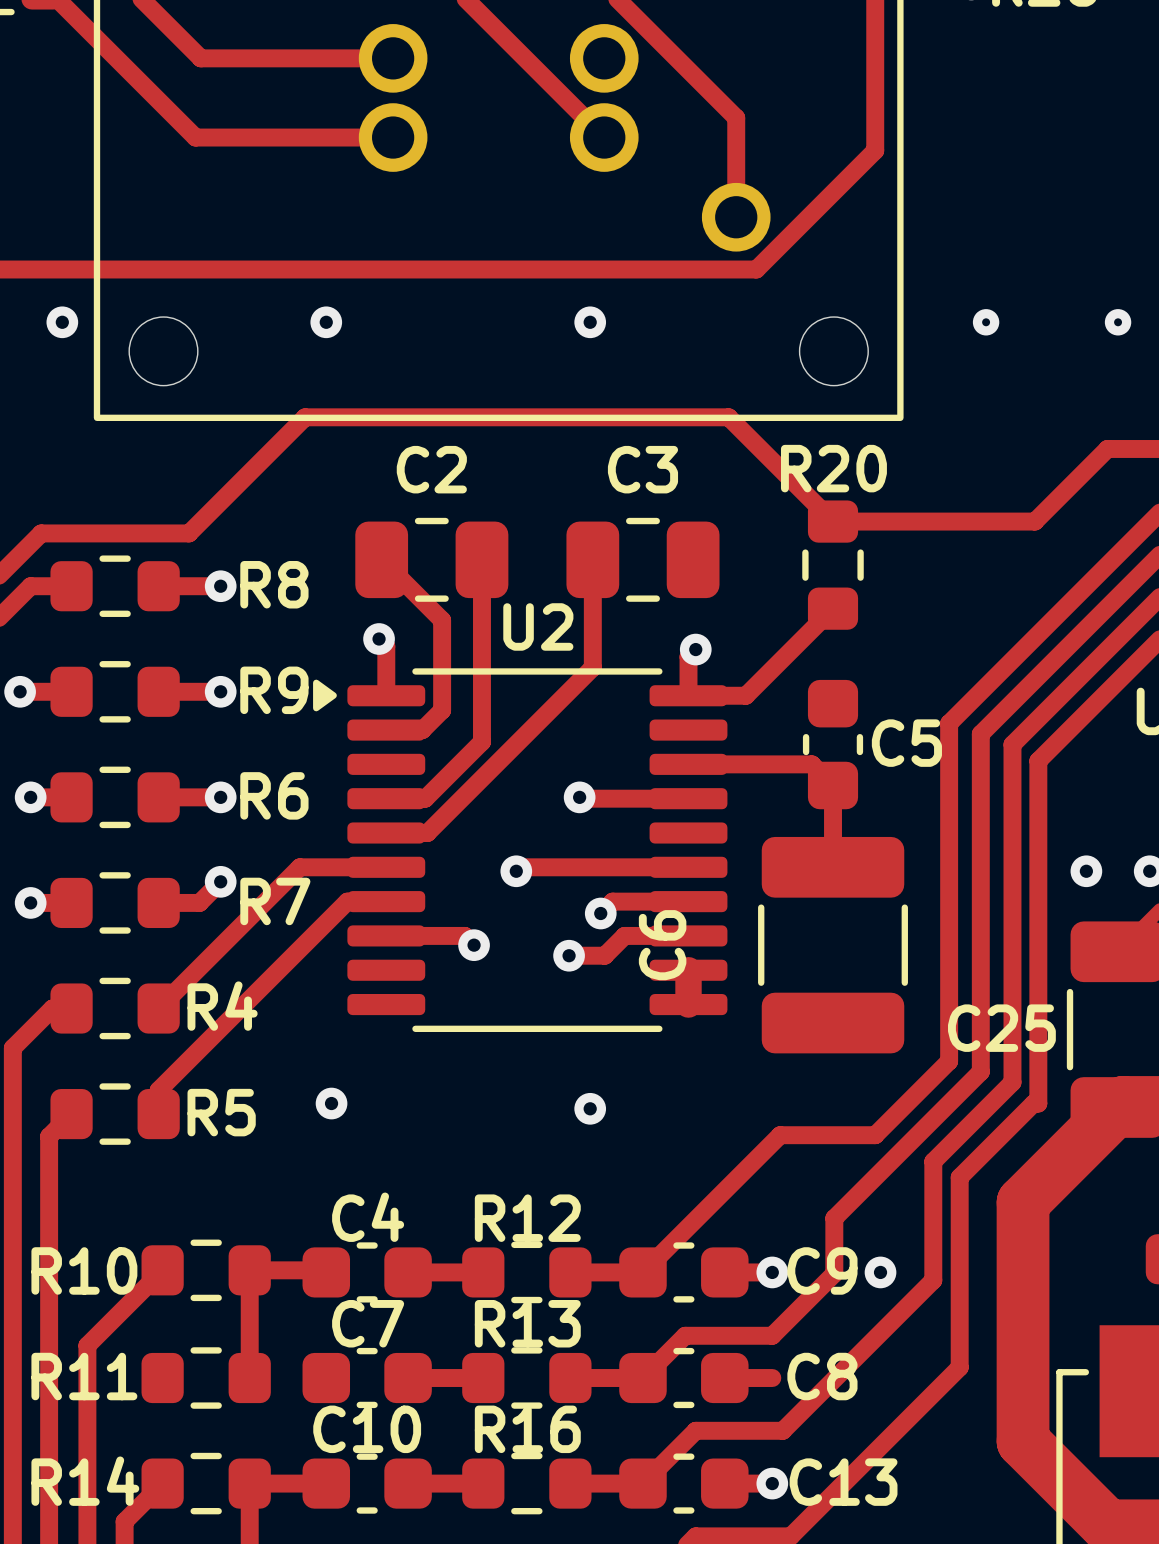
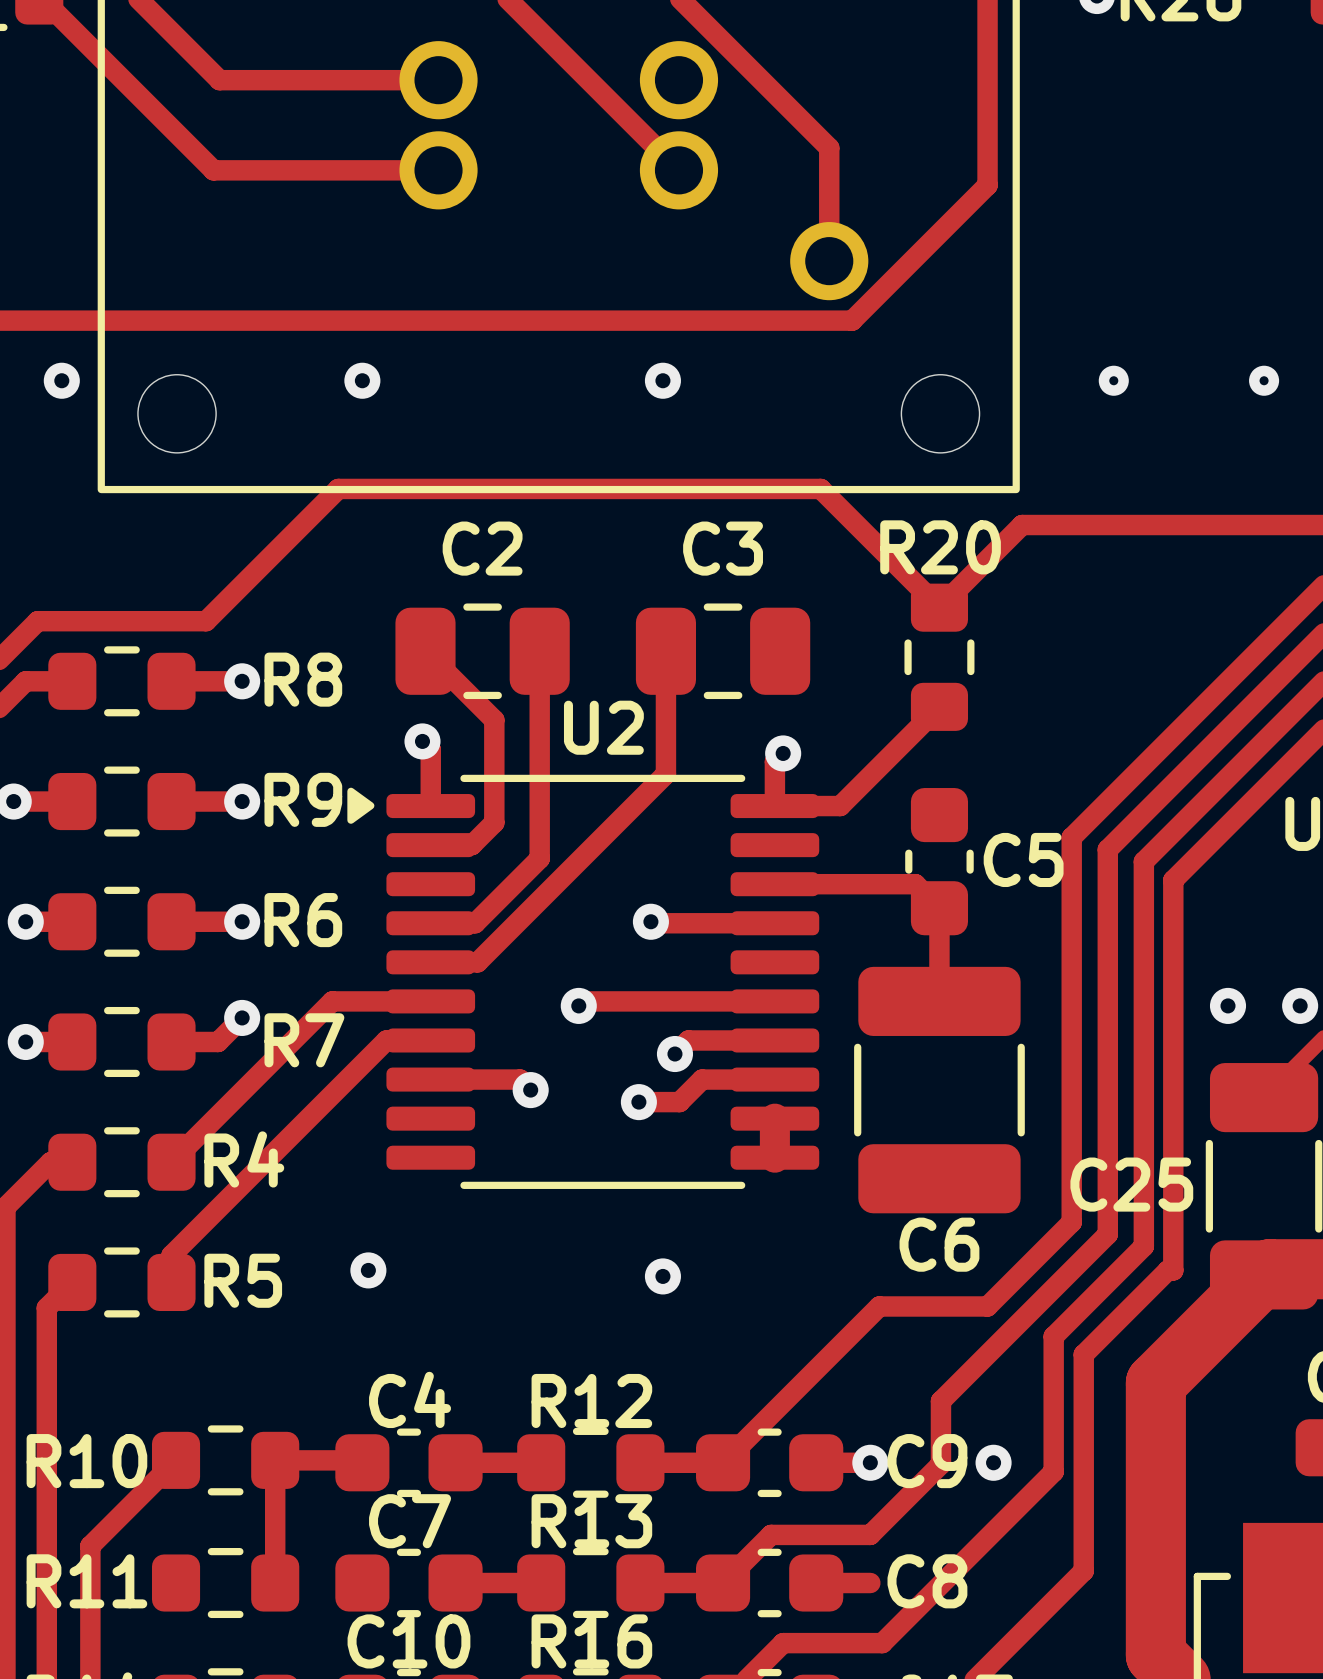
track: (1107, 448) (1034, 521) (833, 521) -> (1252, 525) (1022, 525) (939, 607)
C6 name rotation: 0° (662, 945) -> 90° clockwise (939, 1244)
C6 name position: C6 (662, 945) -> C6 (939, 1244)

